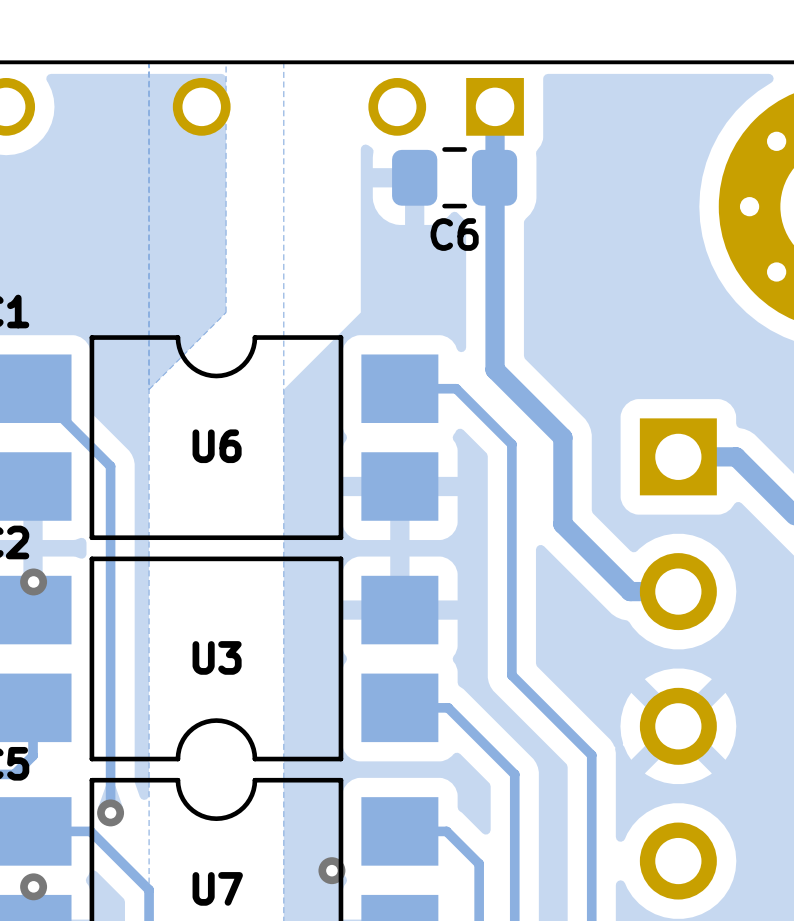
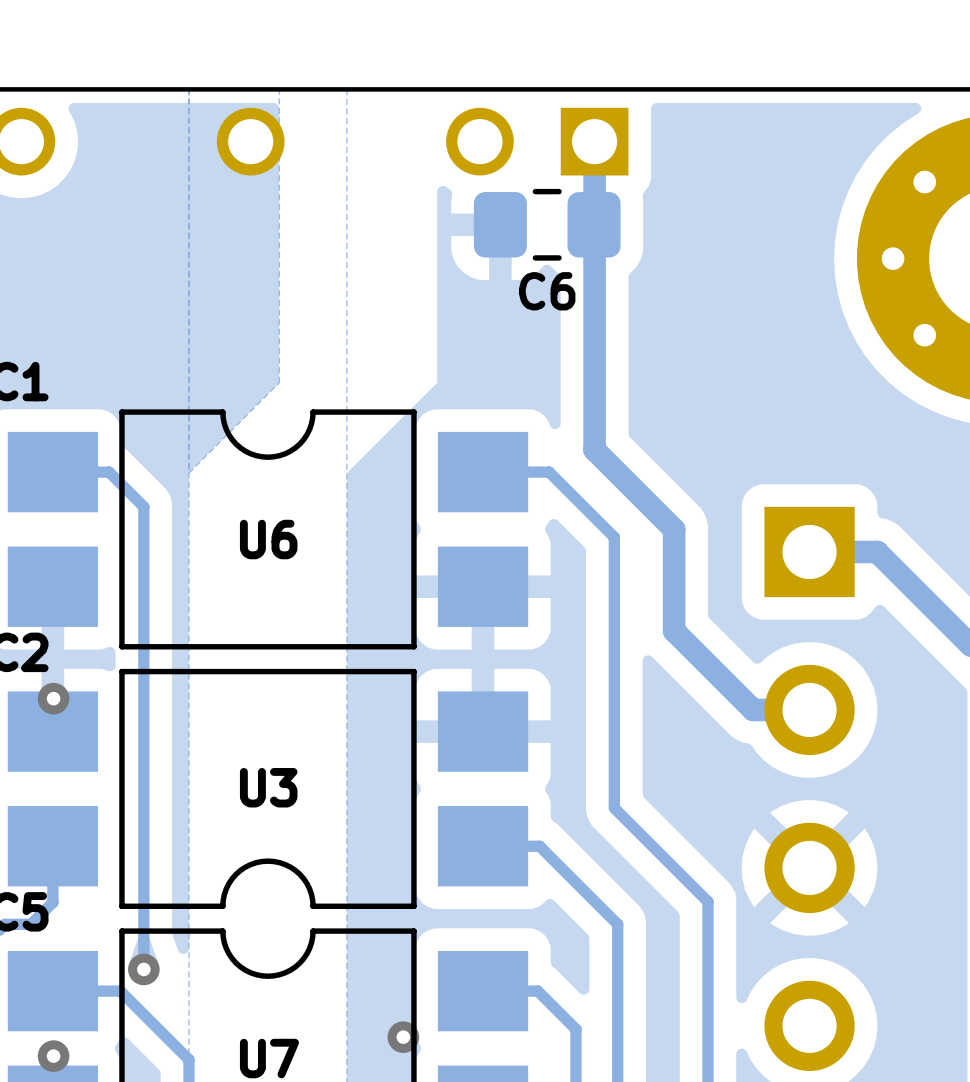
track: (33, 388) (110, 466) -> (52, 472) (109, 472) (143, 506) (143, 563)

